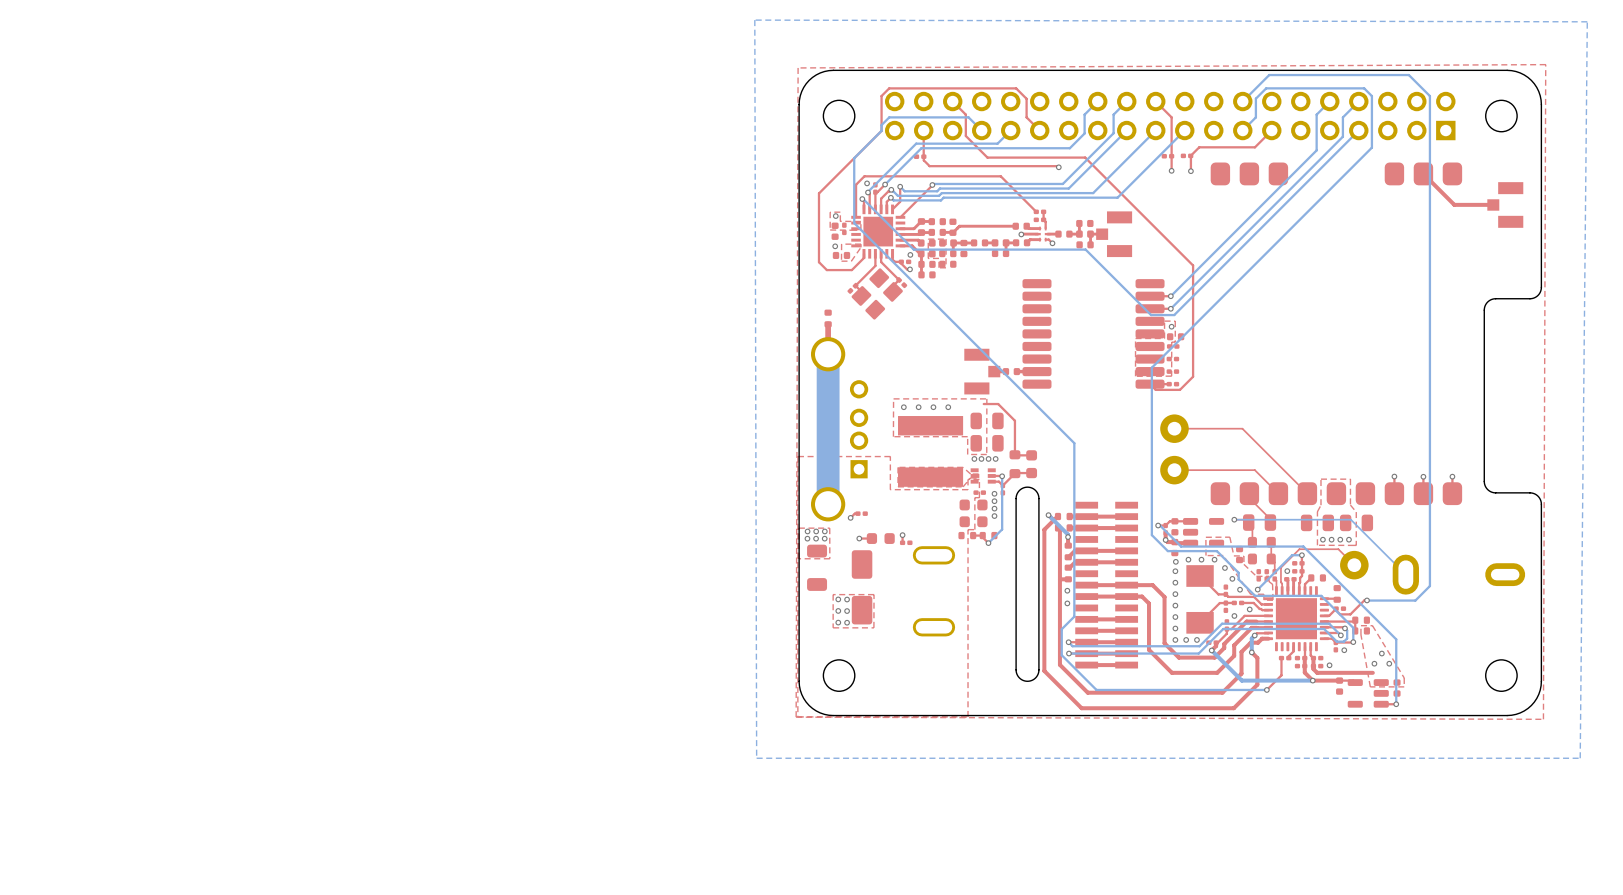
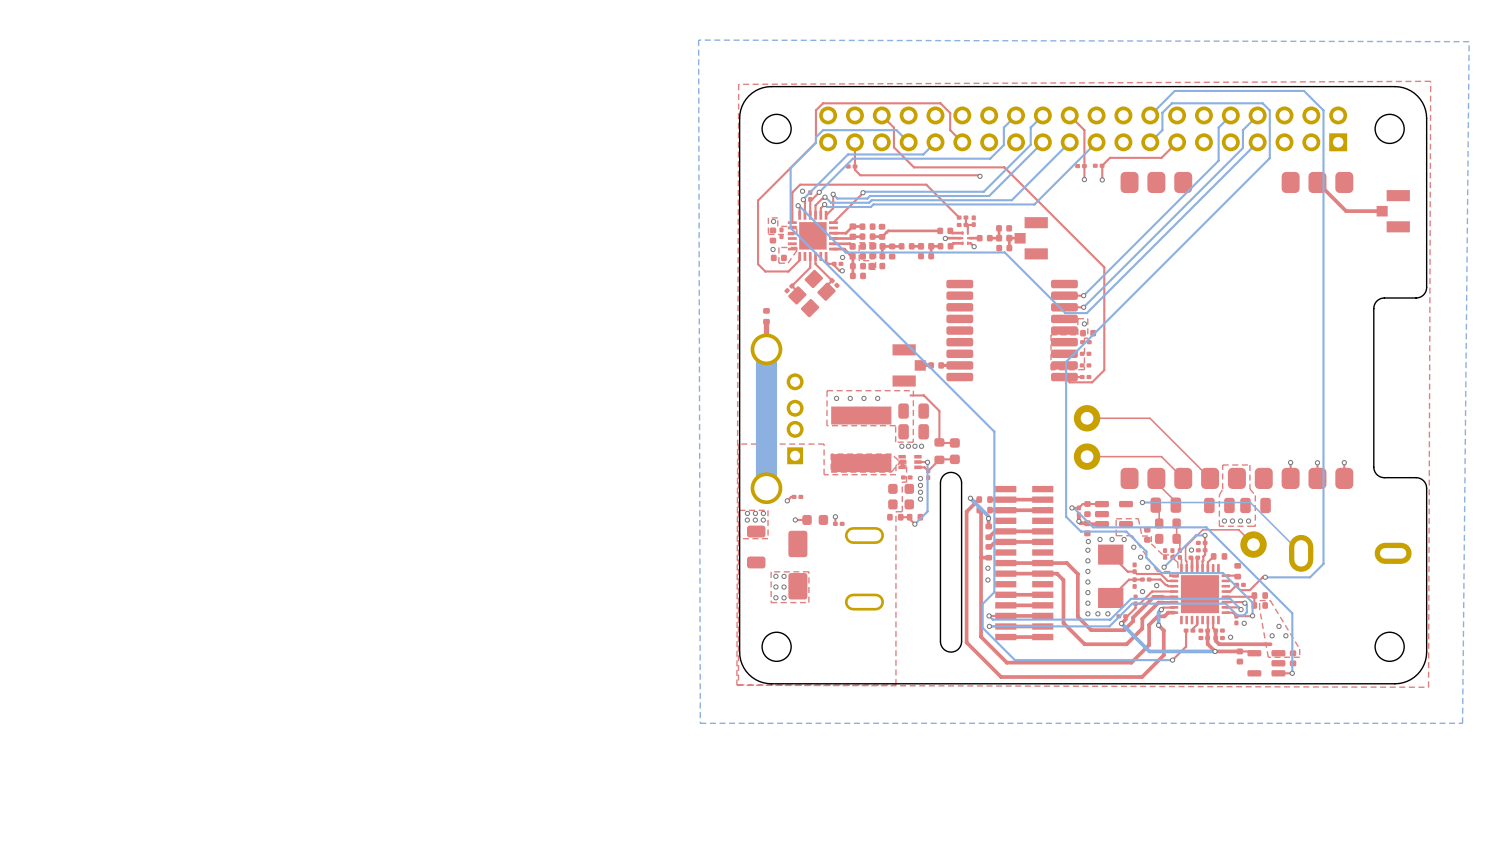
part: none -> (973, 221)
top track: none -> (973, 224) (965, 224)

